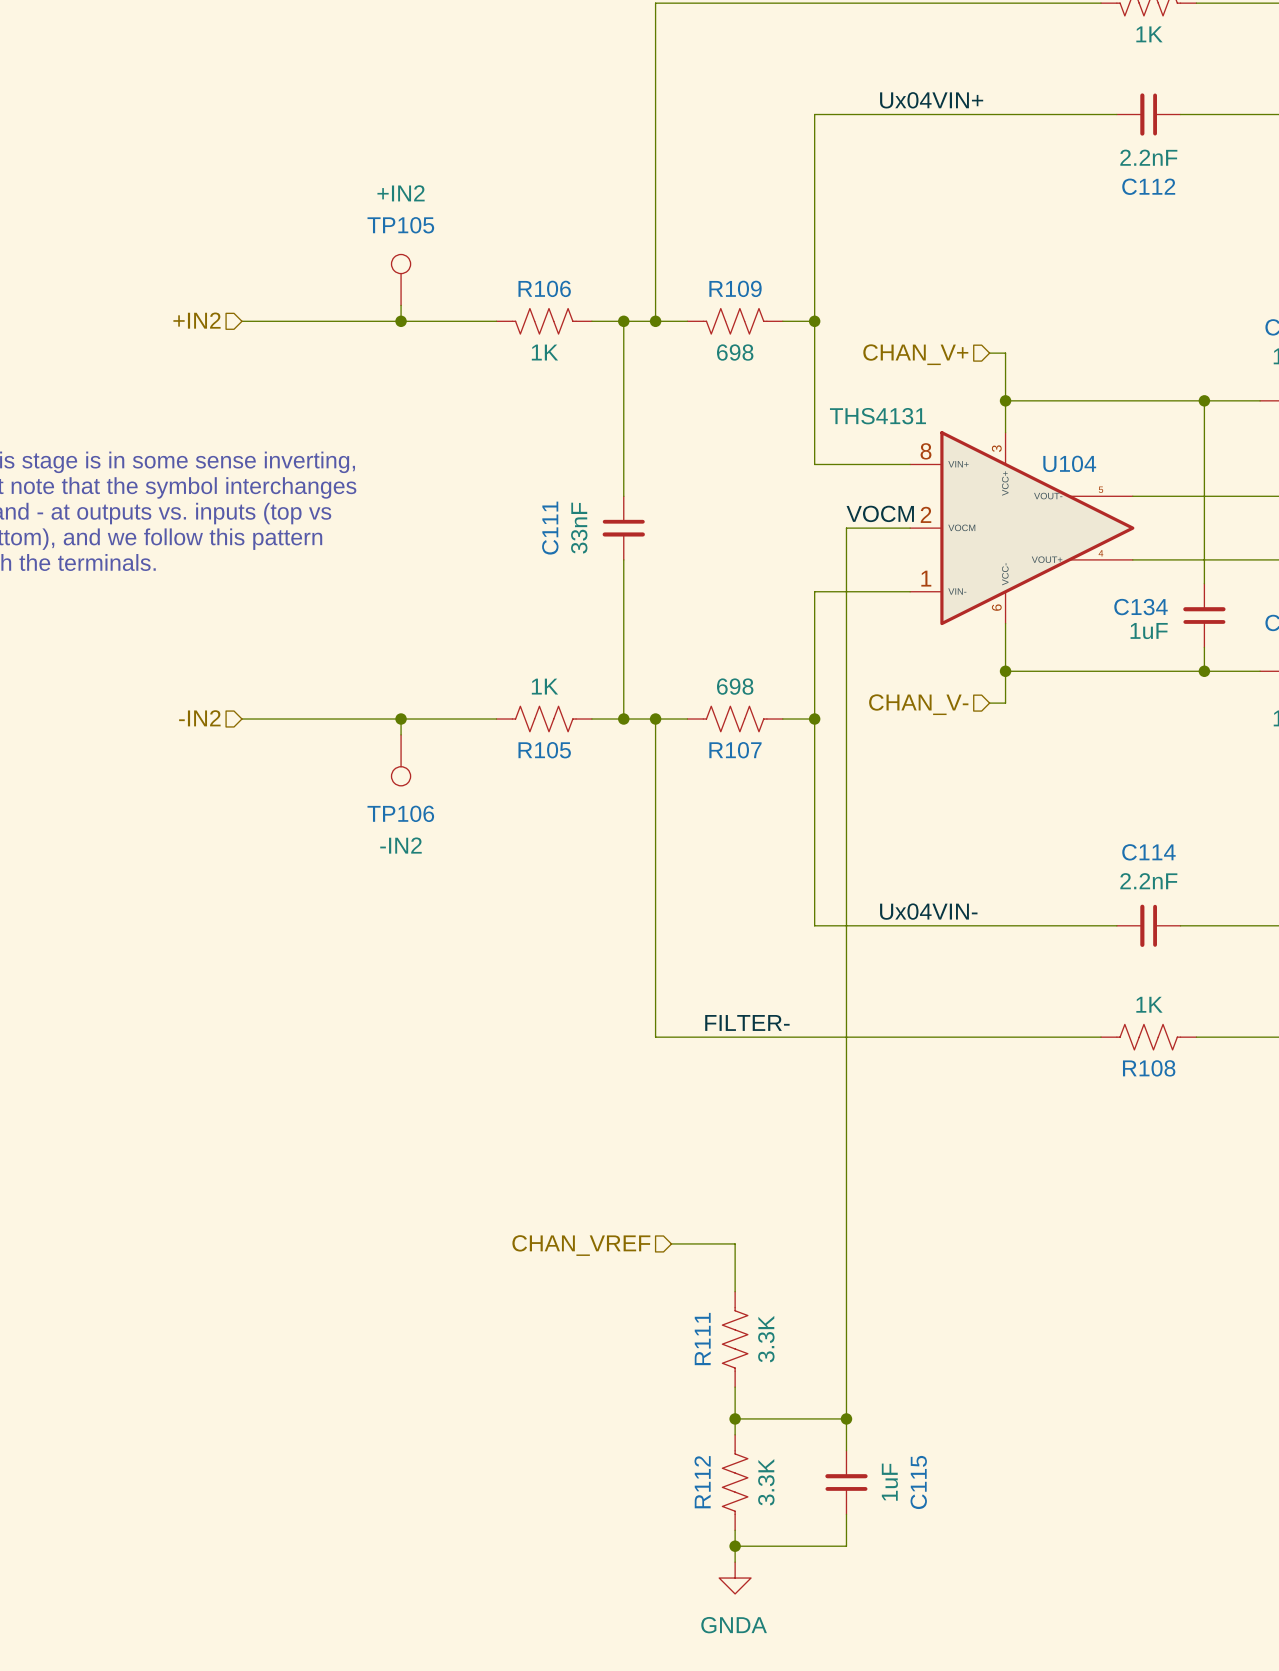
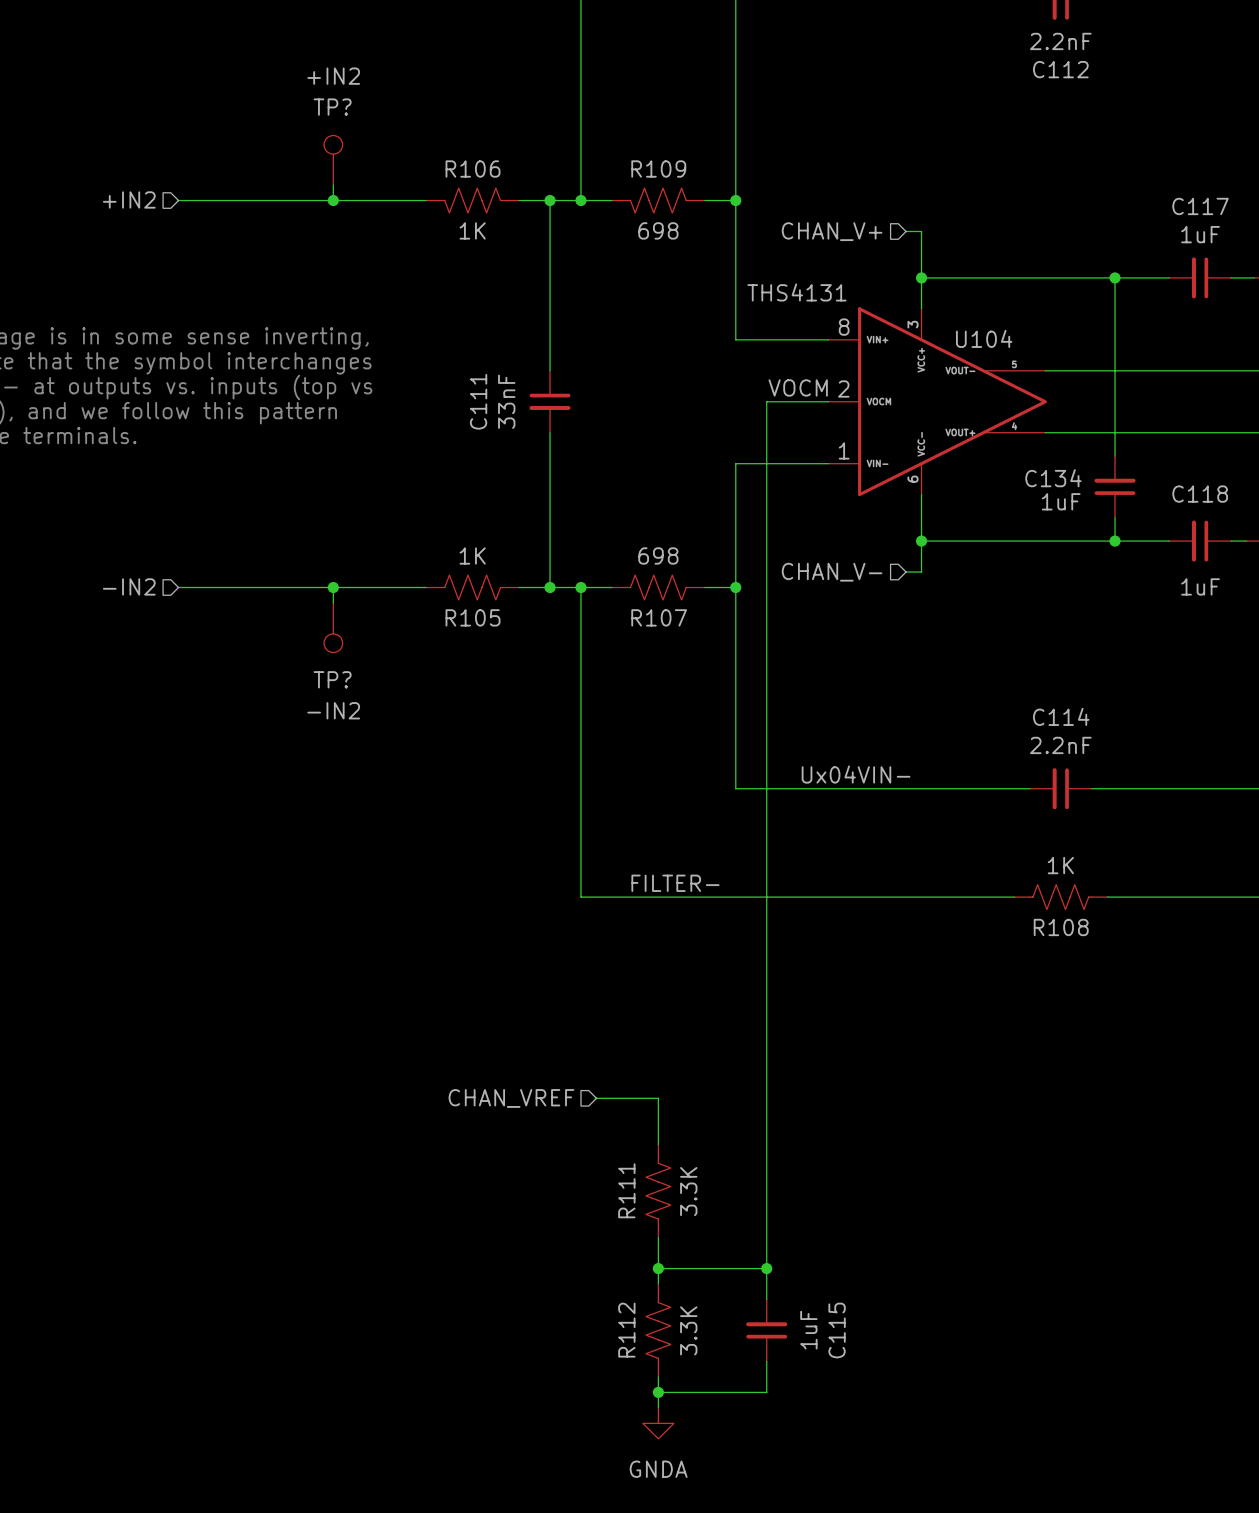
TP105 name: TP105 (400, 225) -> TP? (332, 107)
TP106 name: TP106 (400, 813) -> TP? (332, 679)

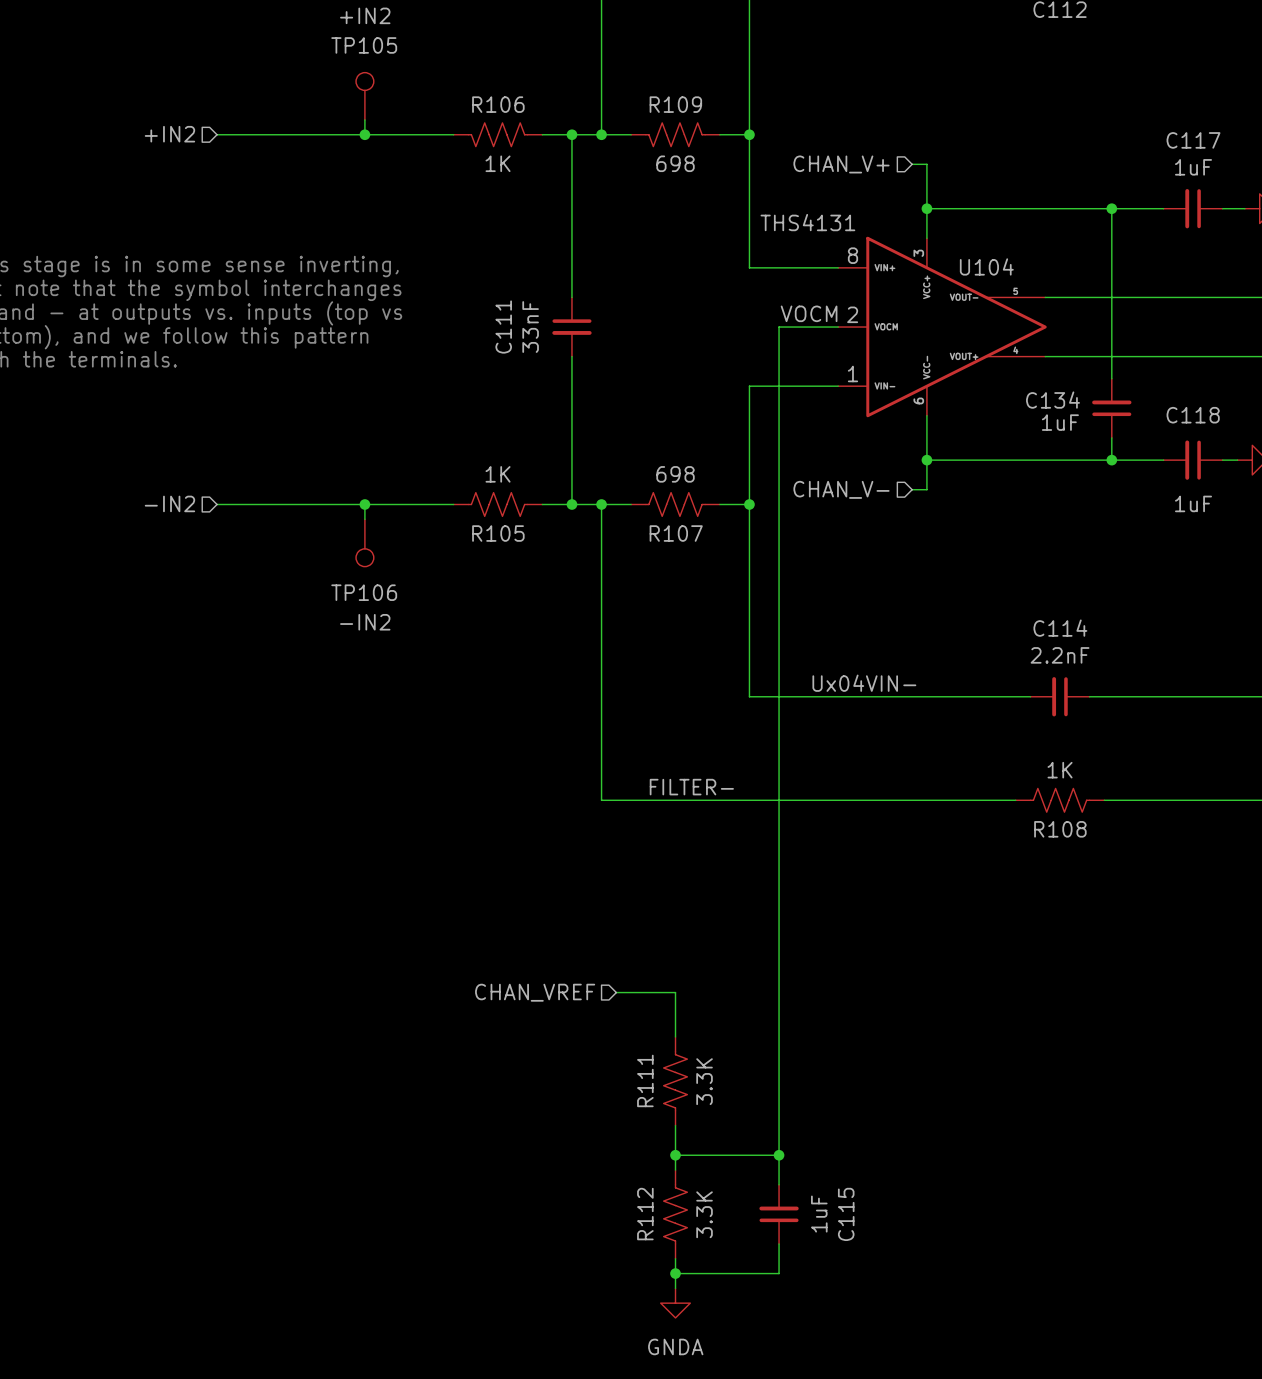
TP? name: TP? (332, 107) -> TP105 (364, 45)
TP? name: TP? (332, 679) -> TP106 (364, 592)

